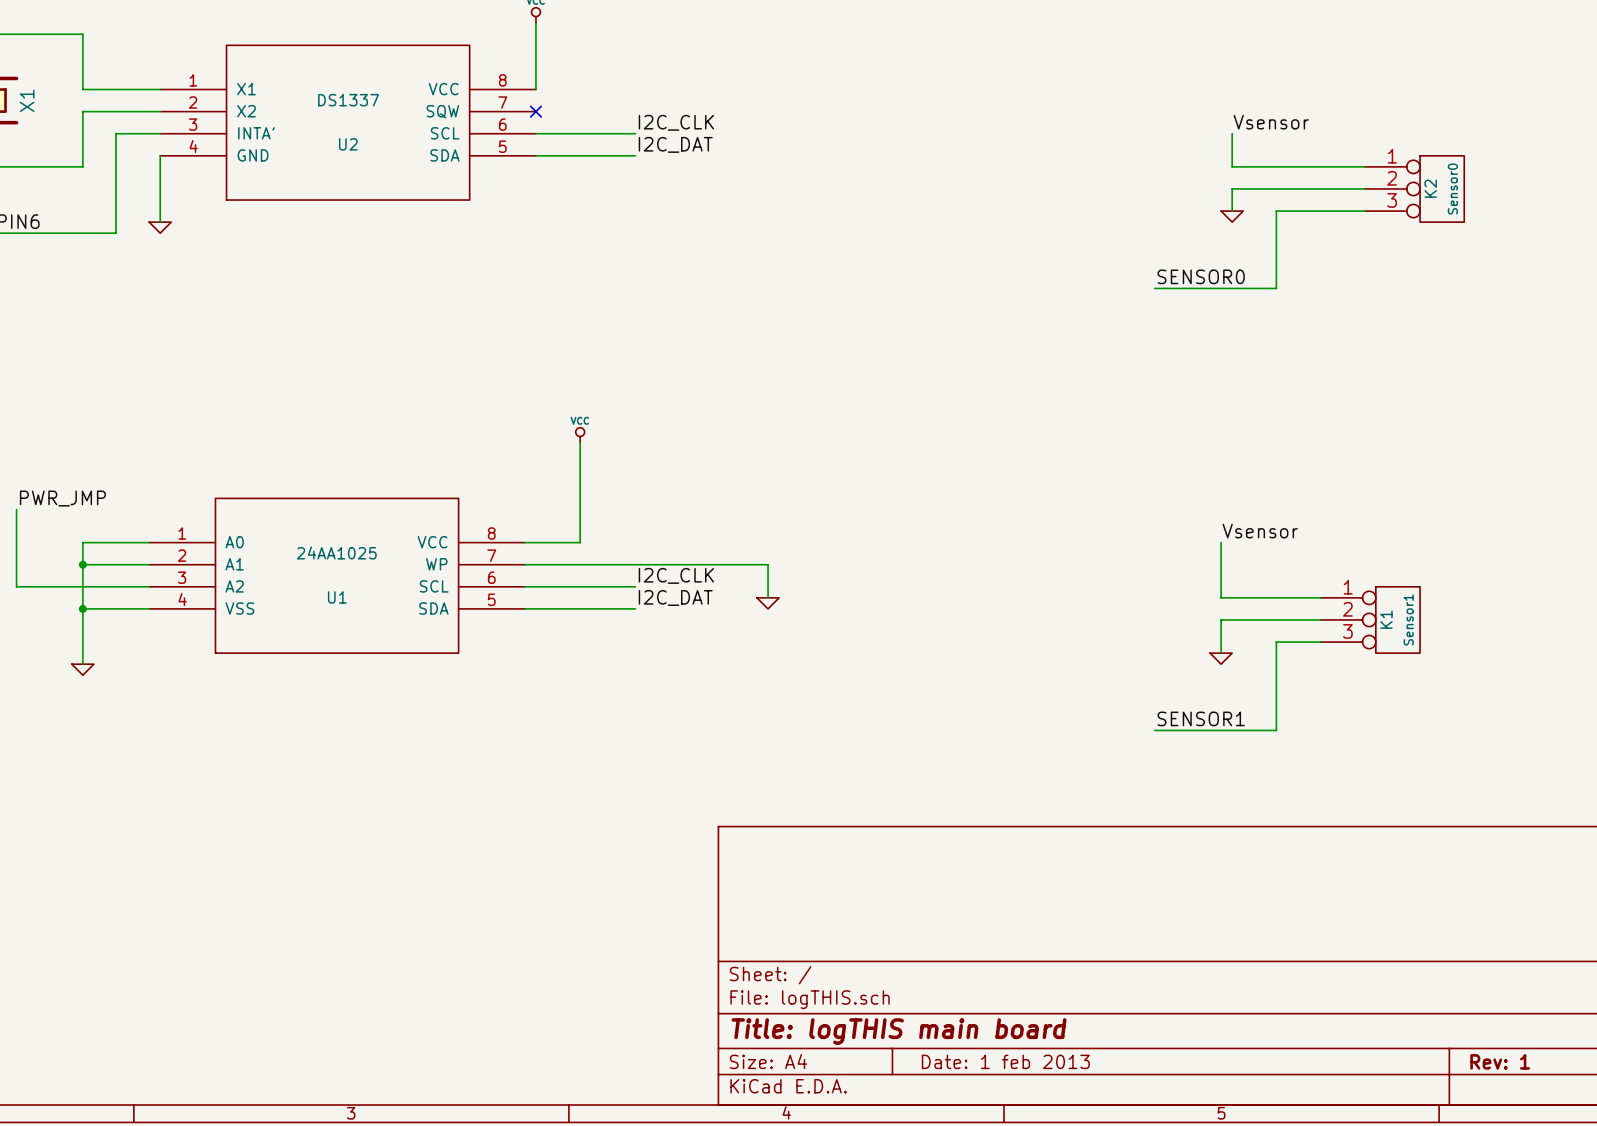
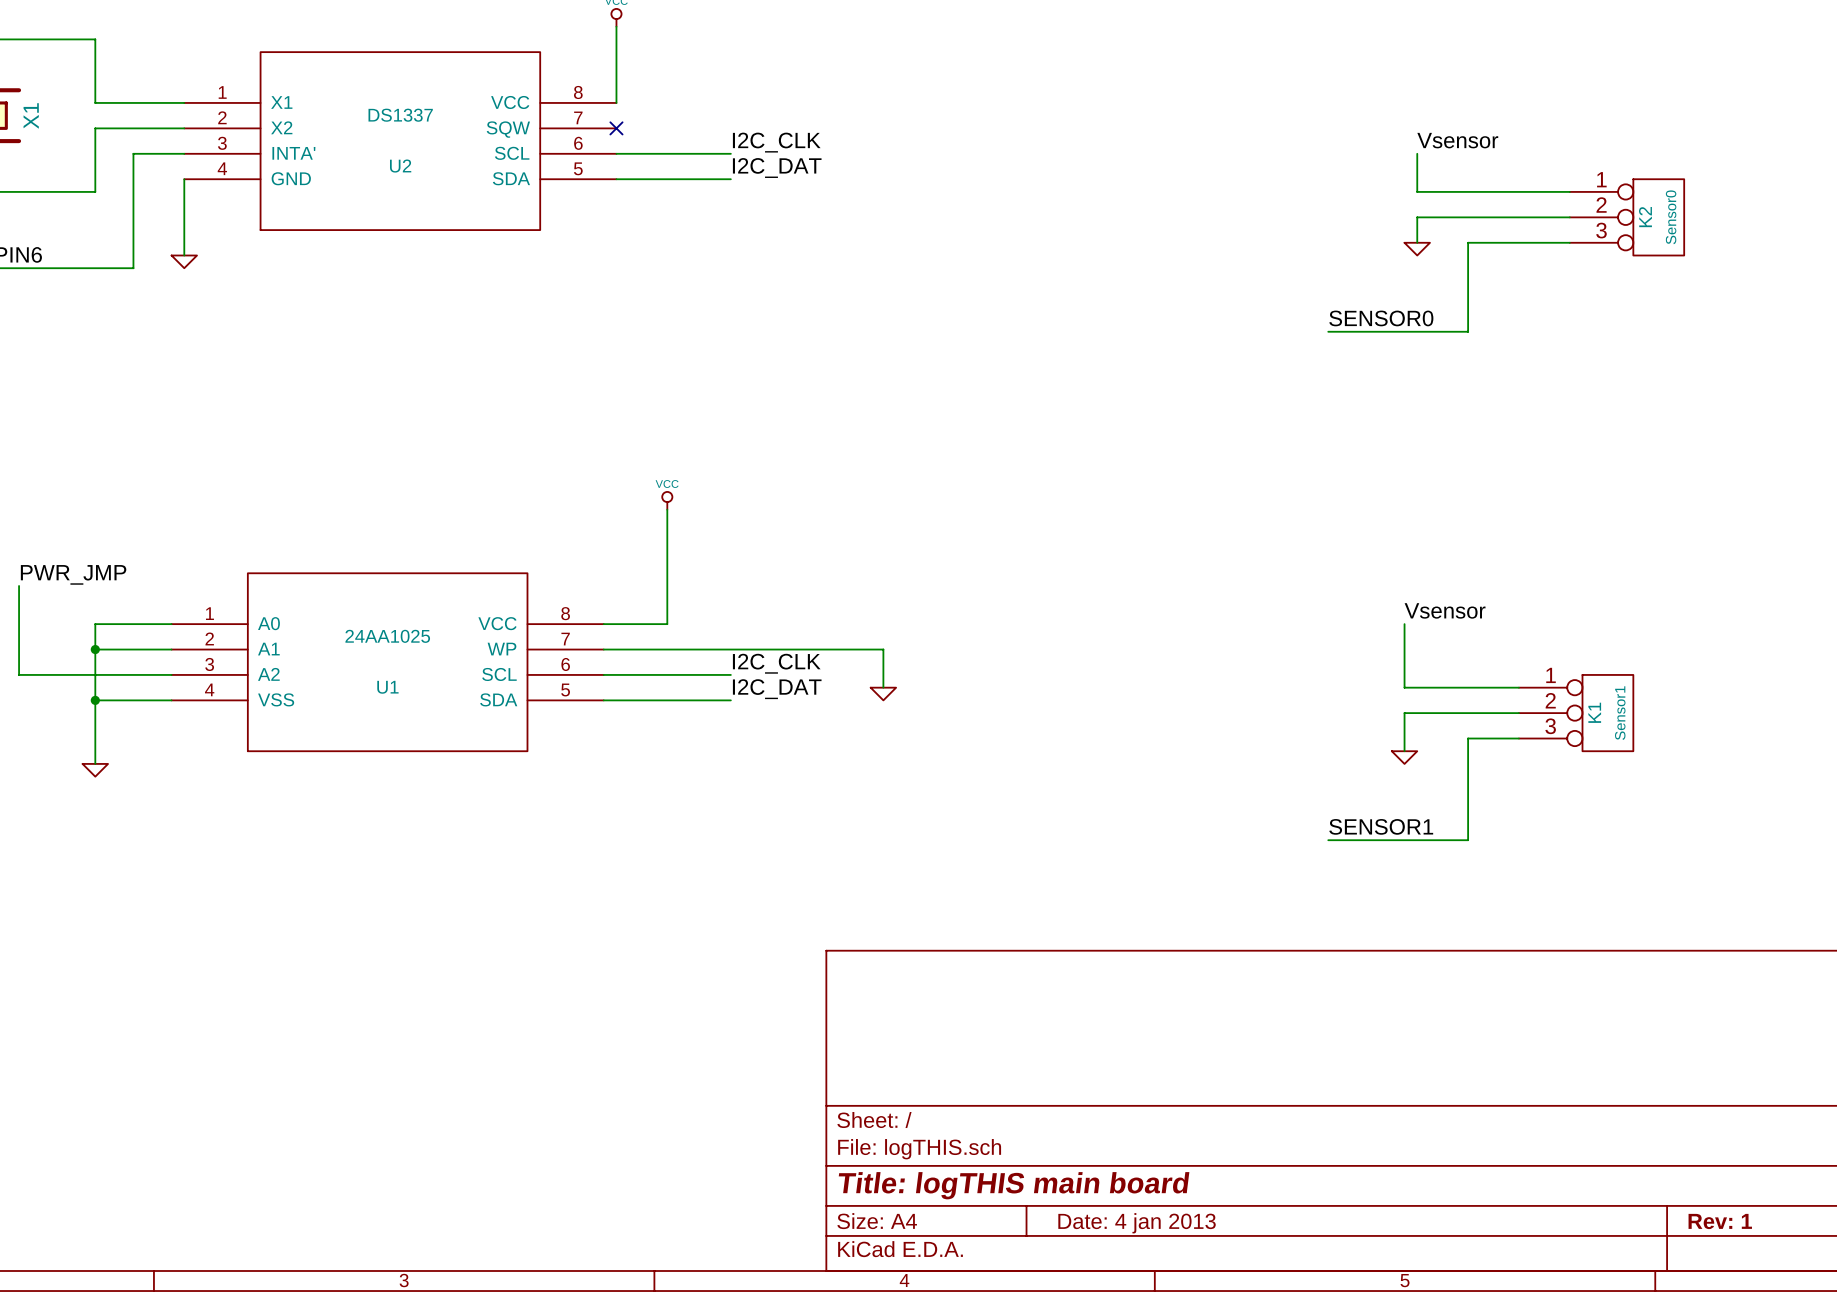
title block: Date: 1 feb 2013 (1005, 1061) -> Date: 4 jan 2013 (1137, 1223)

